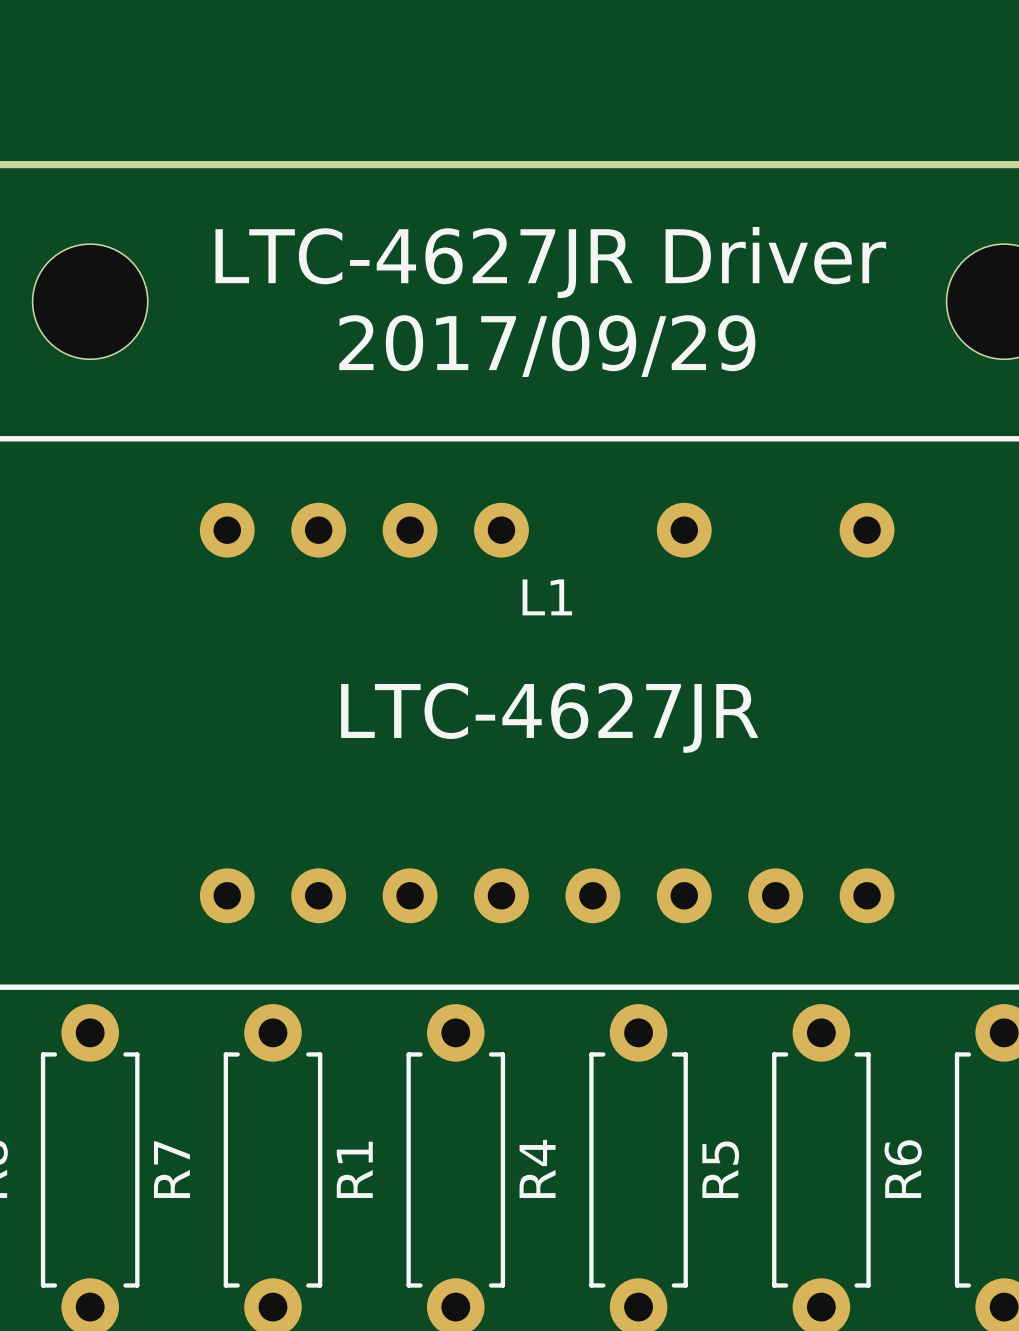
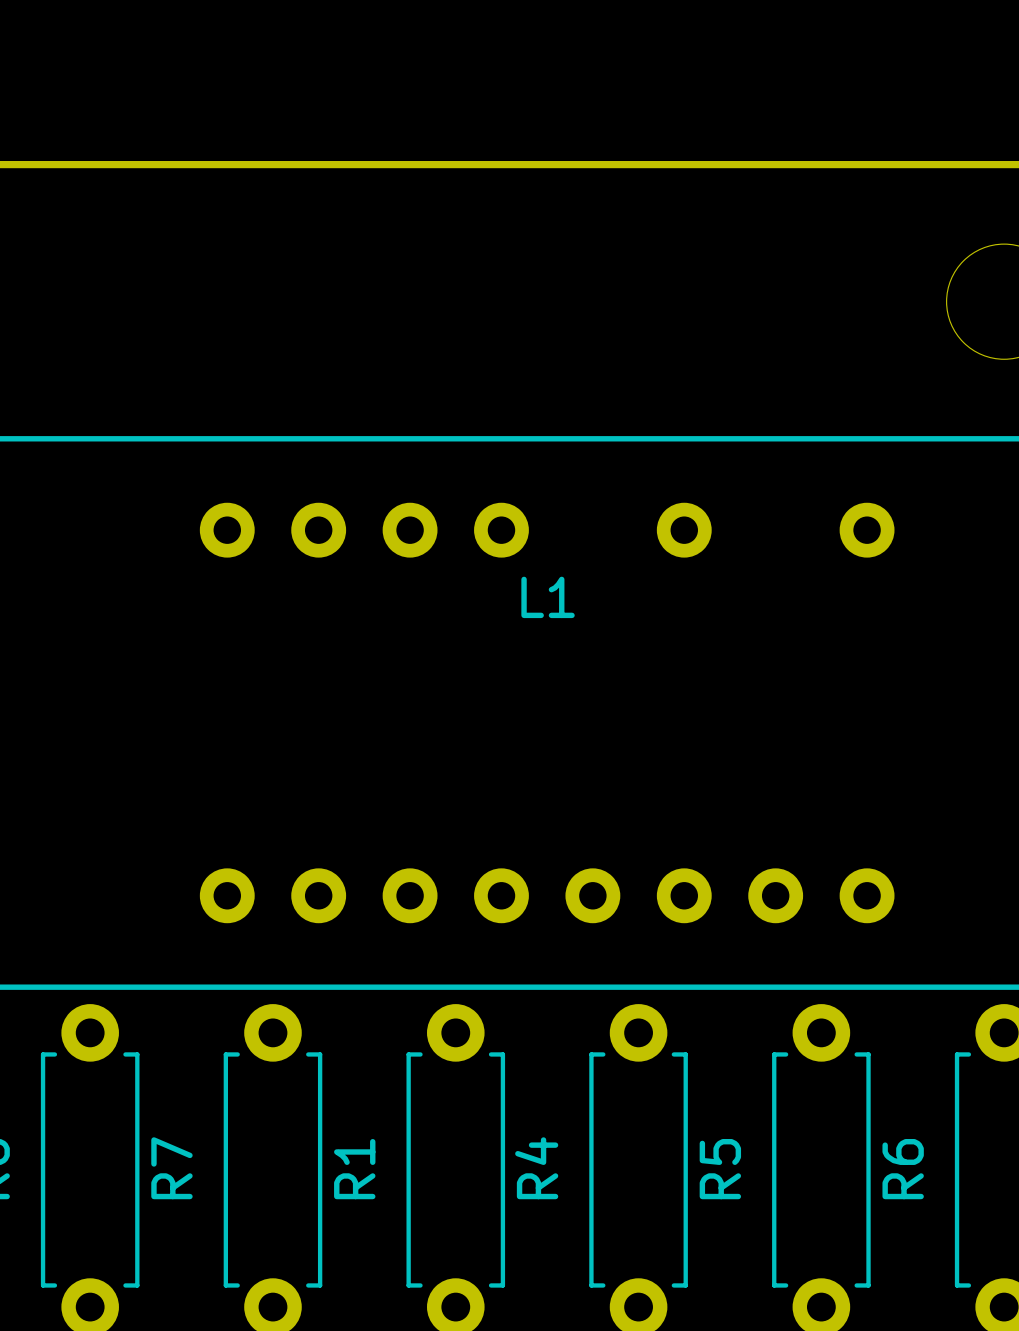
text: LTC-4627JR Driver (550, 262) -> none
part: (90, 301) -> none
text: 2017/09/29 (547, 346) -> none
text: LTC-4627JR (549, 717) -> none

